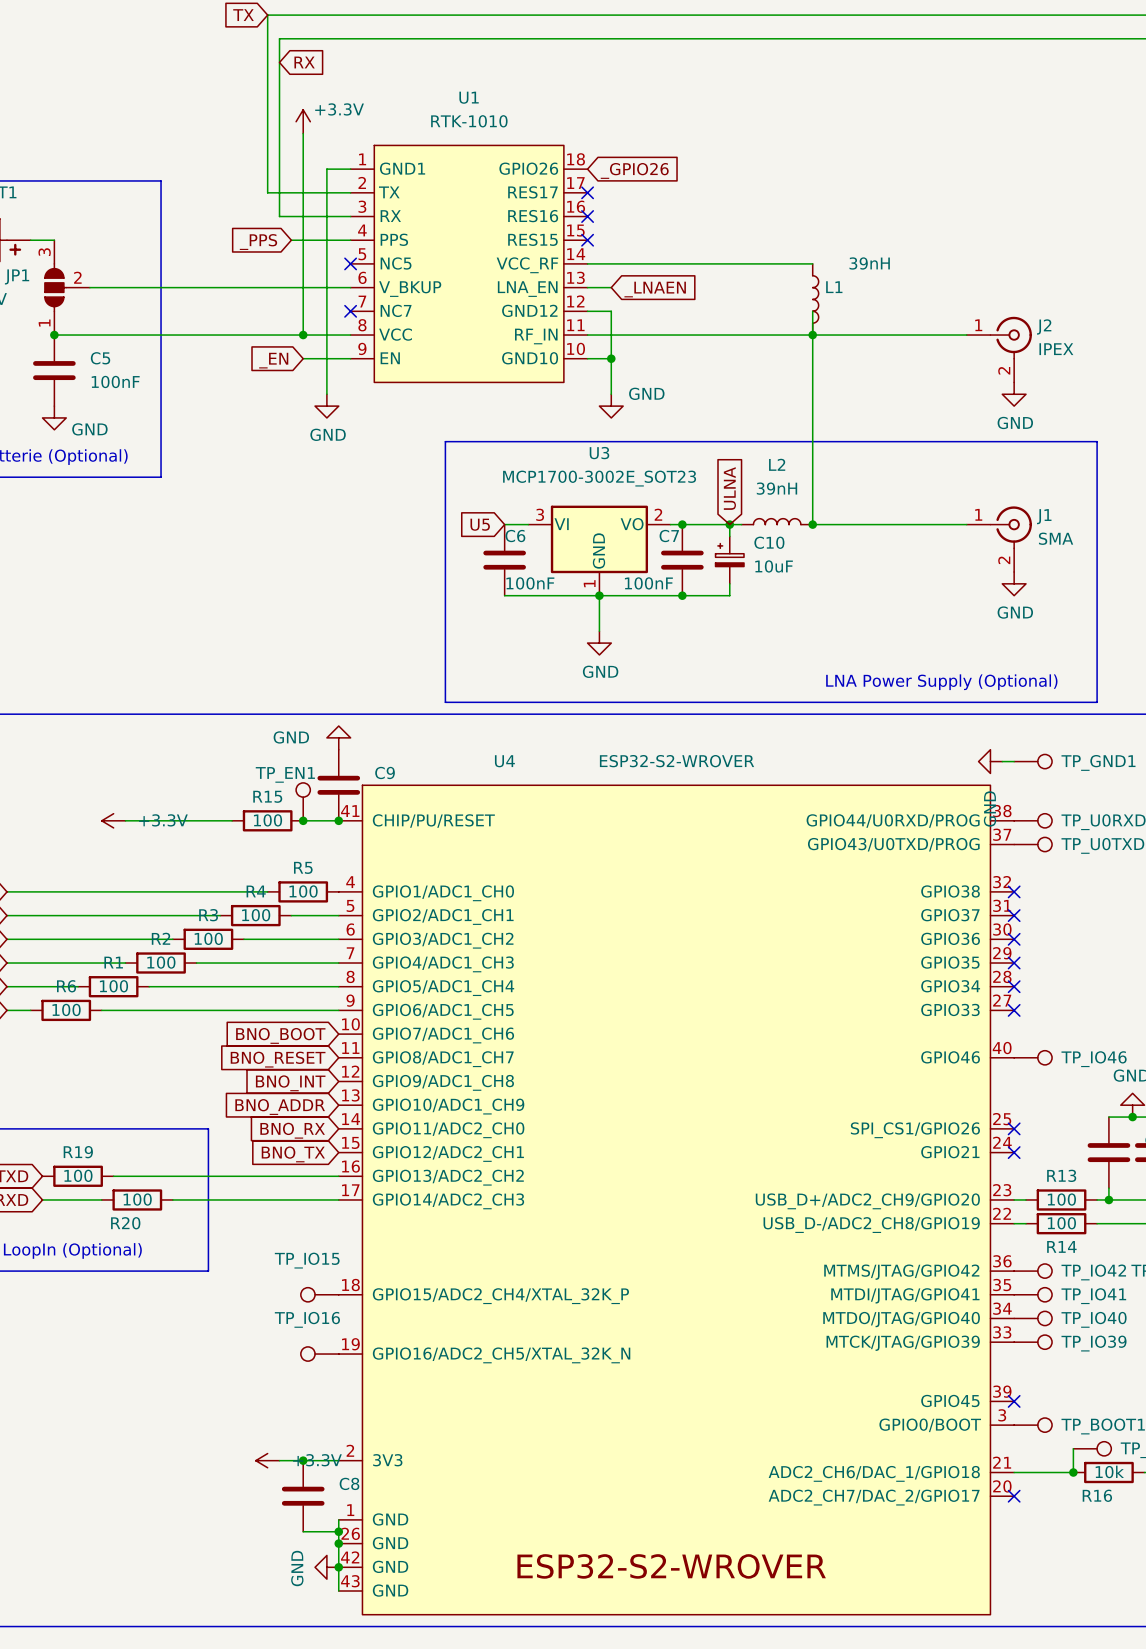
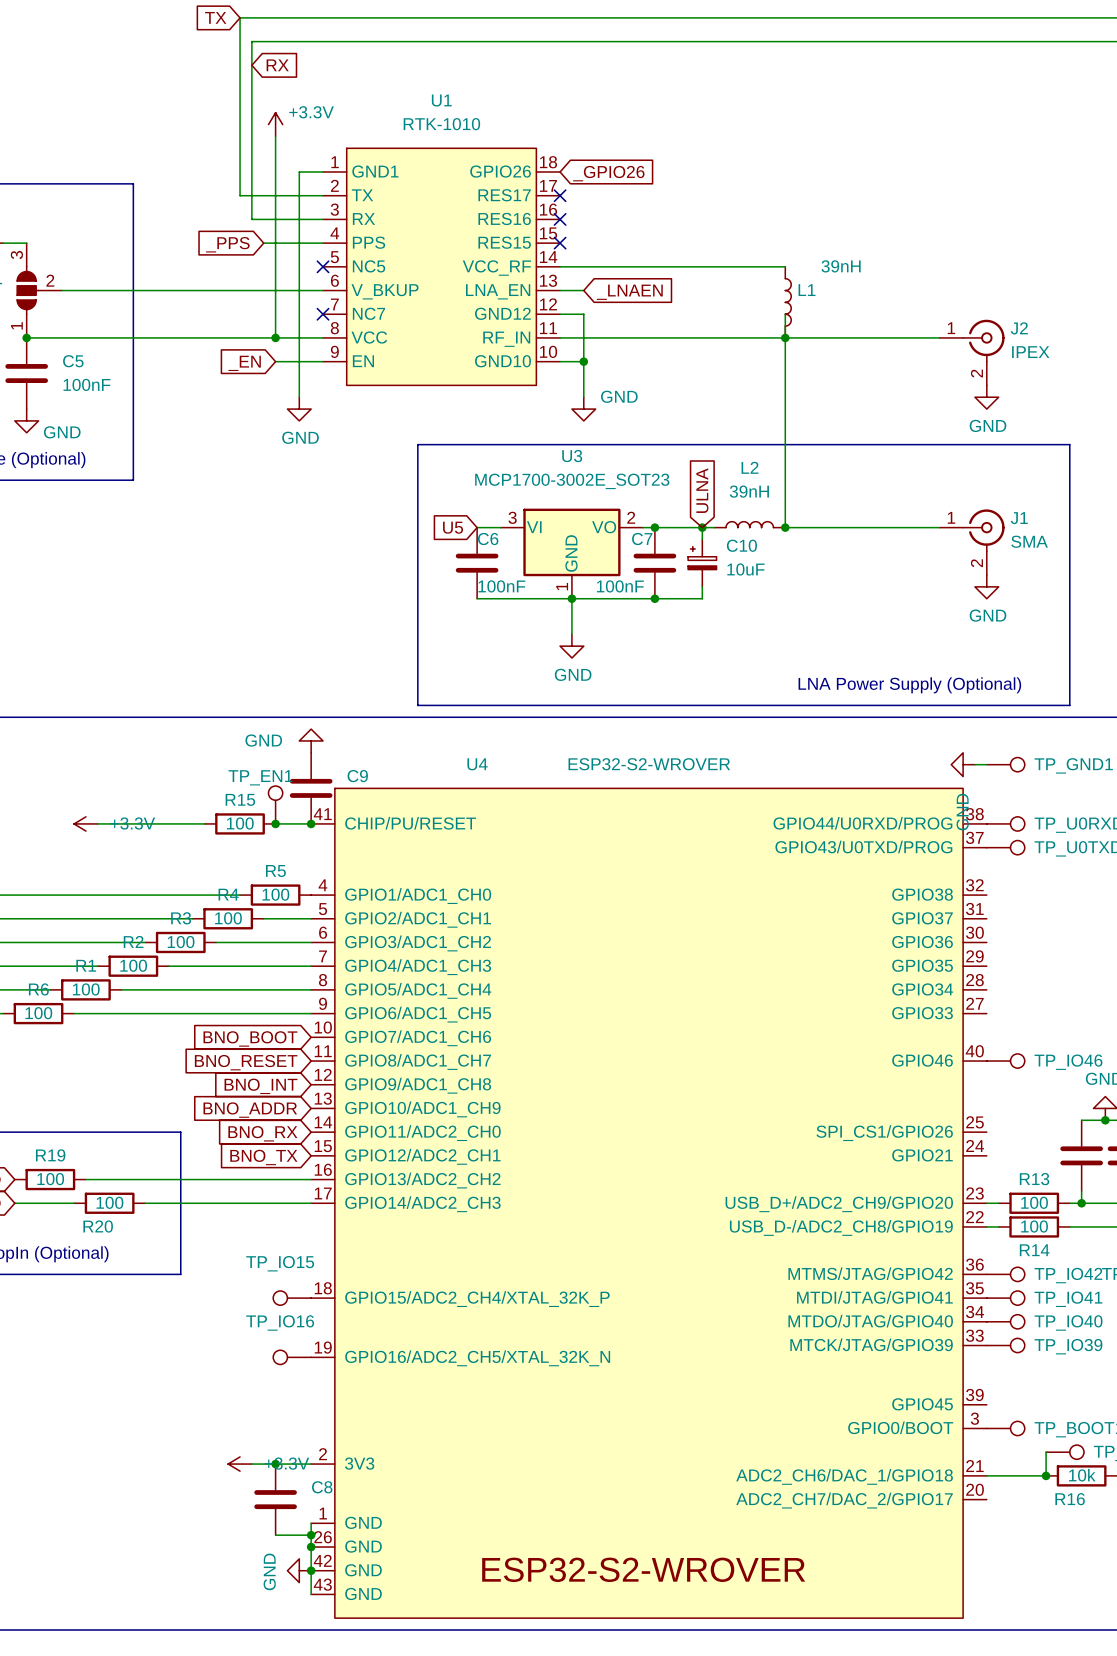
no-connect mark: (1014, 891) -> none
no-connect mark: (1014, 915) -> none
no-connect mark: (1014, 939) -> none
no-connect mark: (1014, 963) -> none
no-connect mark: (1014, 986) -> none
no-connect mark: (1014, 1010) -> none
no-connect mark: (1014, 1128) -> none
no-connect mark: (1014, 1152) -> none
no-connect mark: (1014, 1401) -> none
no-connect mark: (1014, 1496) -> none

